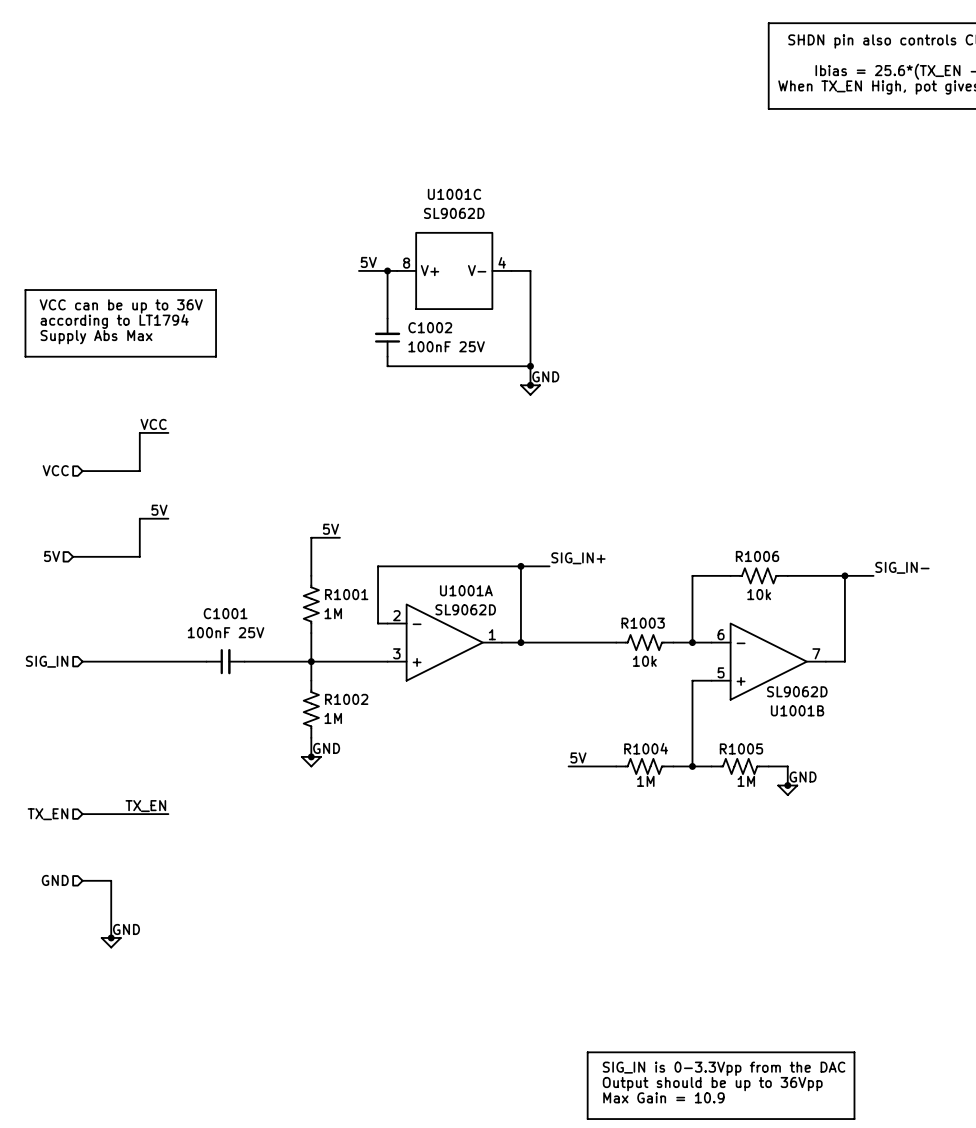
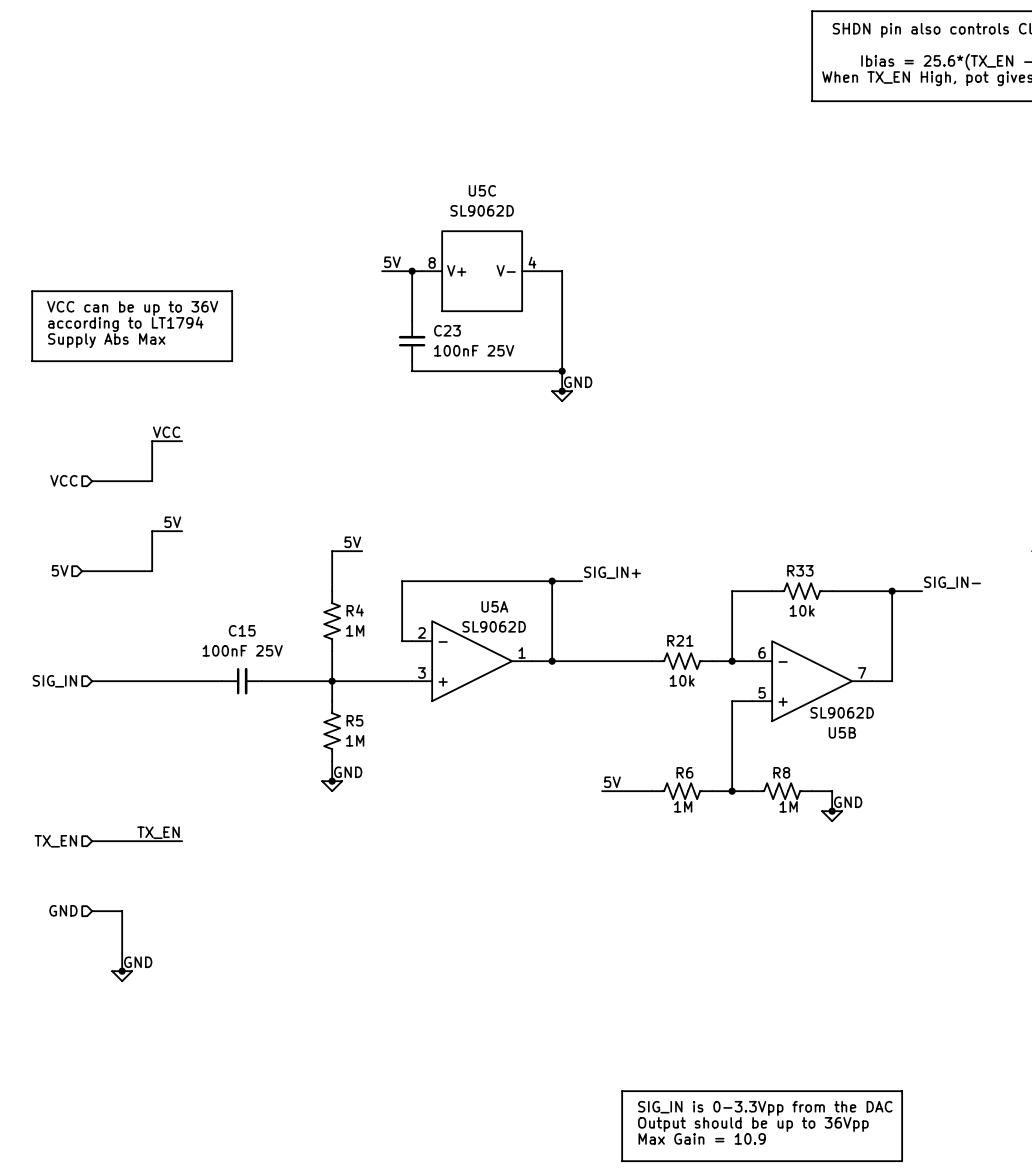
U1001C name: U1001C (454, 194) -> U5C (482, 190)
C1002 name: C1002 (430, 327) -> C23 (447, 330)
R1006 name: R1006 (757, 556) -> R33 (800, 570)
U1001A name: U1001A (466, 590) -> U5A (494, 606)
R1001 name: R1001 (346, 594) -> R4 (355, 610)
C1001 name: C1001 (225, 613) -> C15 (242, 630)
R1003 name: R1003 (643, 623) -> R21 (680, 640)
R1002 name: R1002 (346, 699) -> R5 (354, 720)
U1001B name: U1001B (797, 710) -> U5B (842, 732)
R1004 name: R1004 (646, 748) -> R6 (684, 772)
R1005 name: R1005 (741, 748) -> R8 (781, 772)

